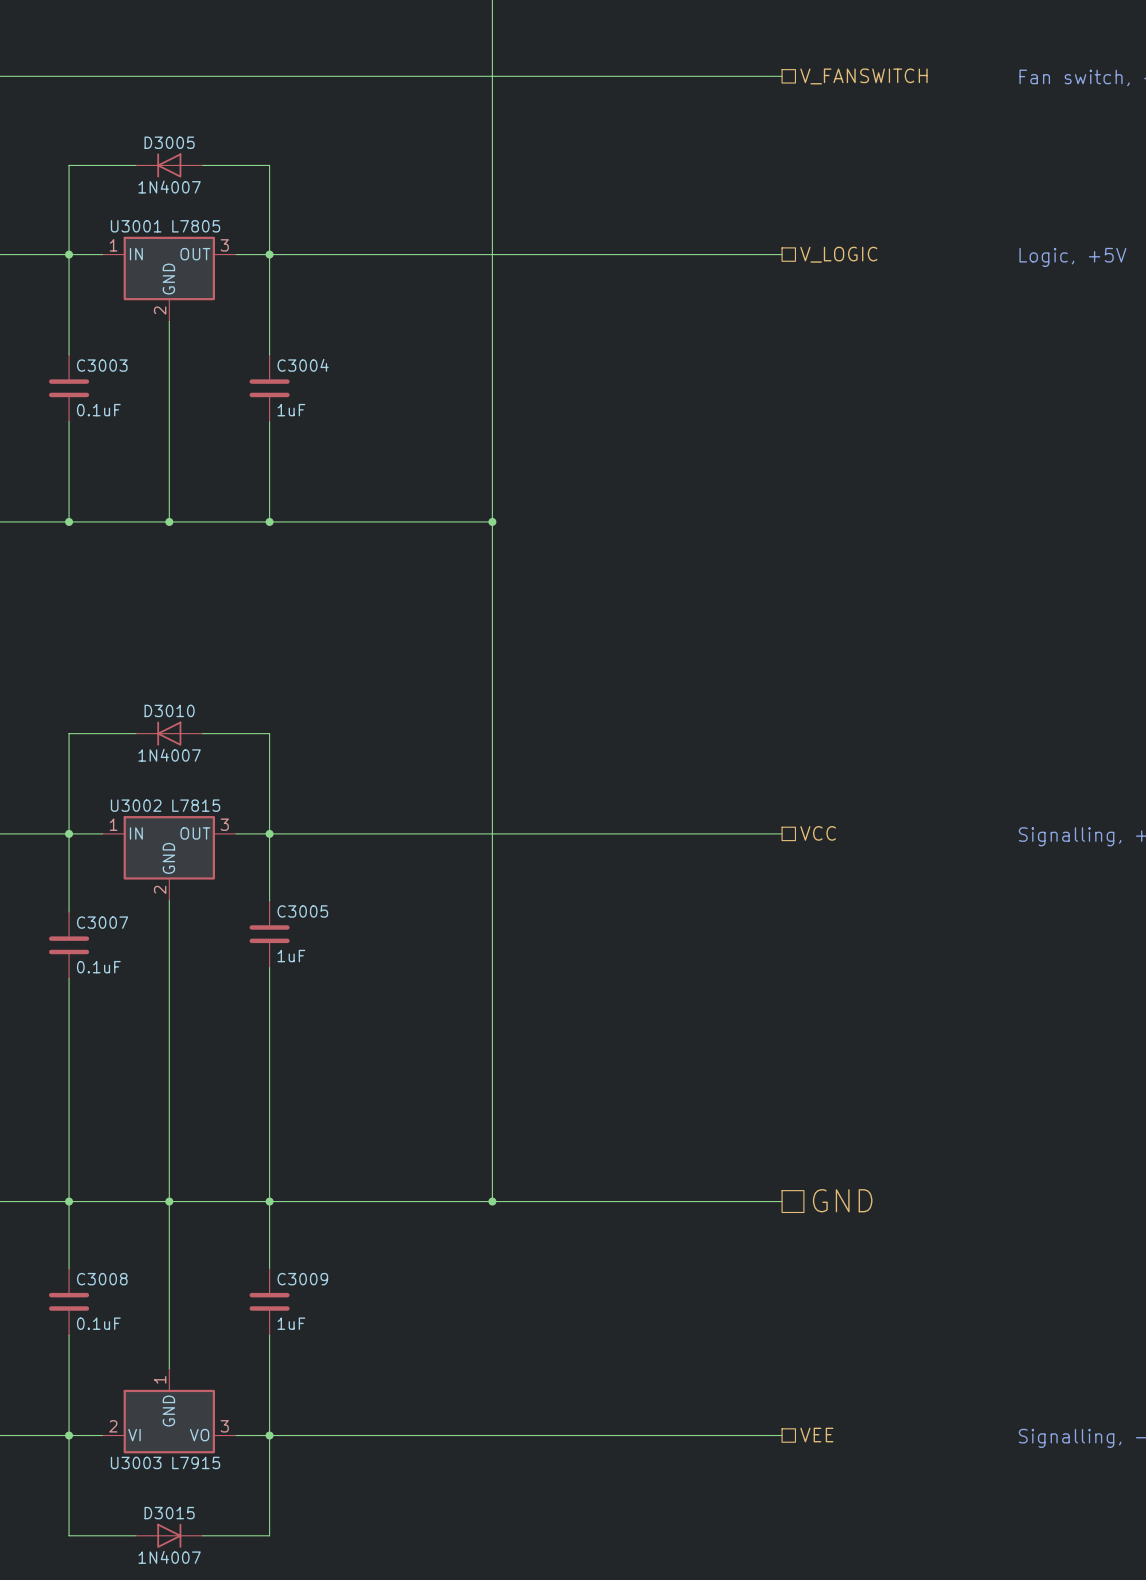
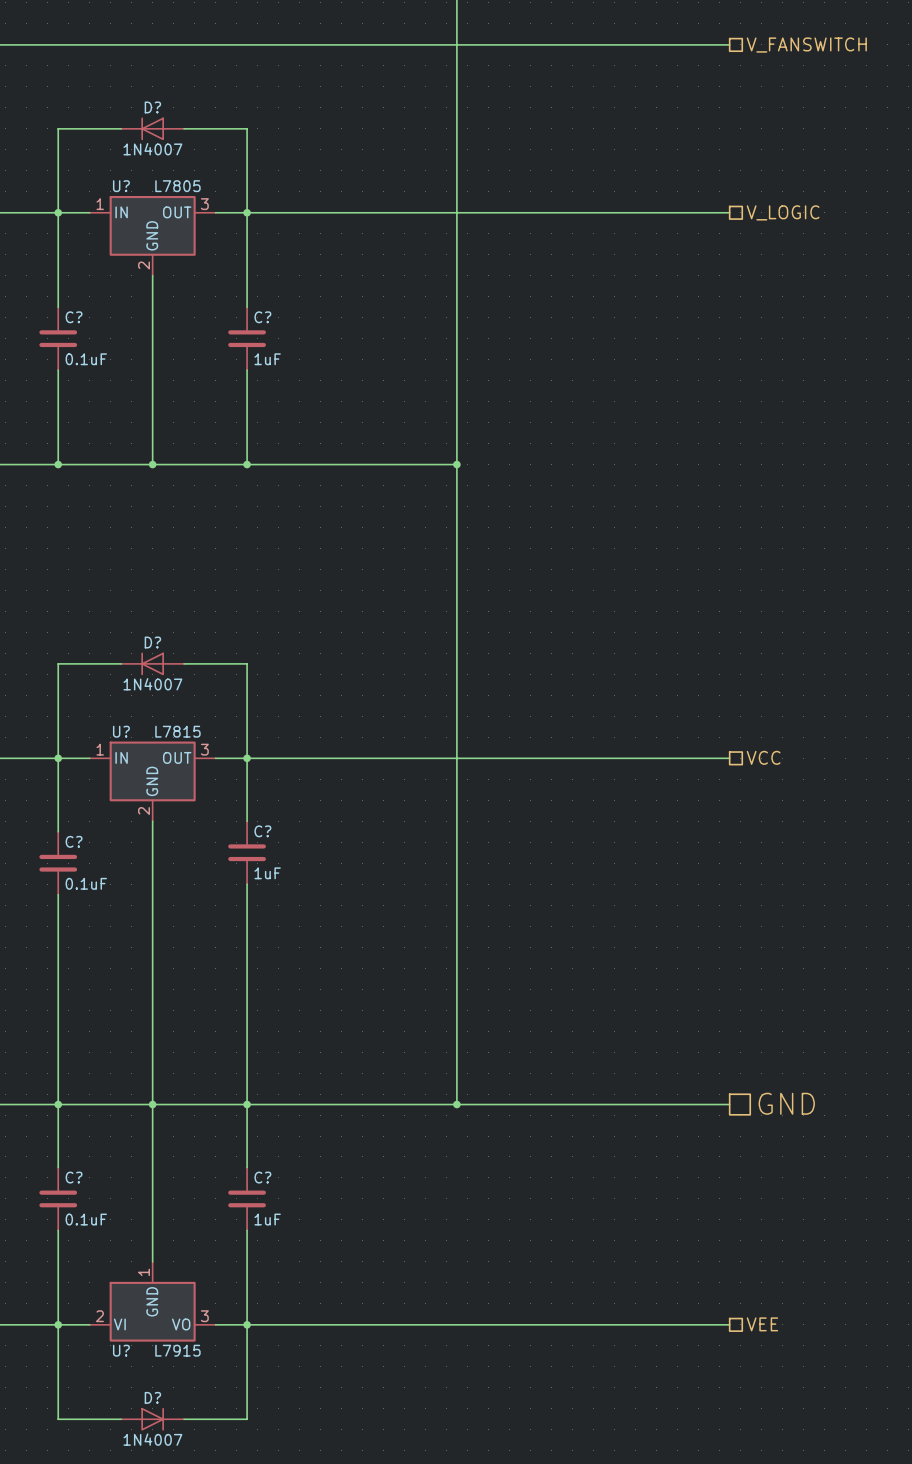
D3005 name: D3005 (169, 142) -> D? (152, 107)
U3001 name: U3001 (136, 226) -> U? (121, 186)
C3003 name: C3003 (102, 365) -> C? (74, 317)
C3004 name: C3004 (303, 365) -> C? (262, 317)
D3010 name: D3010 (169, 710) -> D? (152, 642)
U3002 name: U3002 (136, 805) -> U? (121, 731)
C3005 name: C3005 (302, 911) -> C? (262, 831)
C3007 name: C3007 (102, 922) -> C? (74, 841)
C3008 name: C3008 (102, 1279) -> C? (74, 1177)
C3009 name: C3009 (302, 1279) -> C? (262, 1177)
U3003 name: U3003 (136, 1462) -> U? (121, 1350)
D3015 name: D3015 (169, 1513) -> D? (152, 1397)

